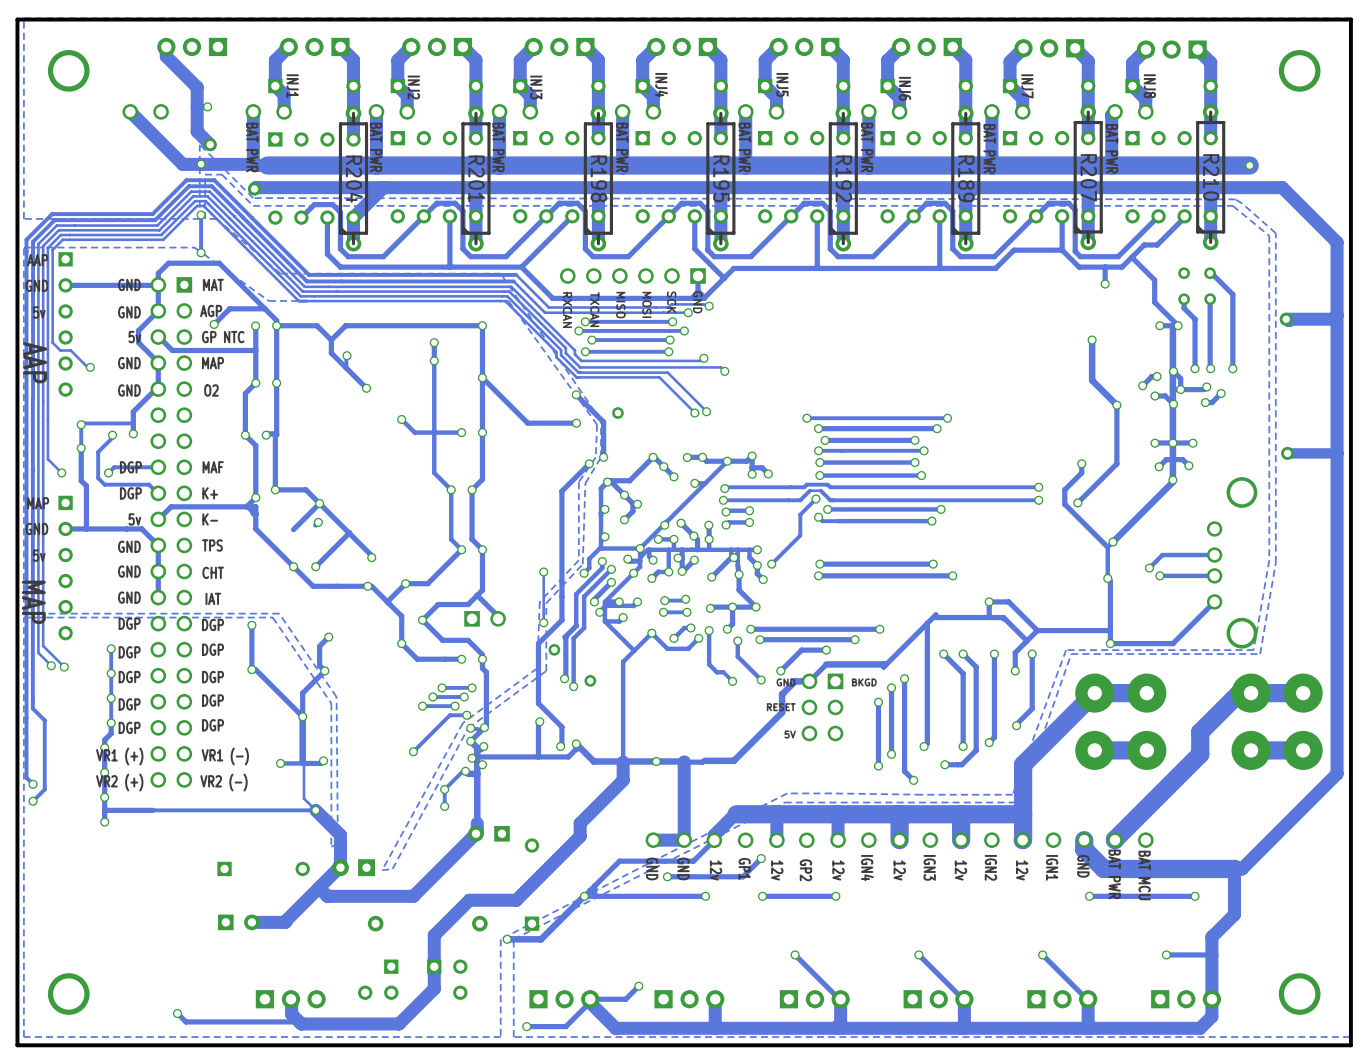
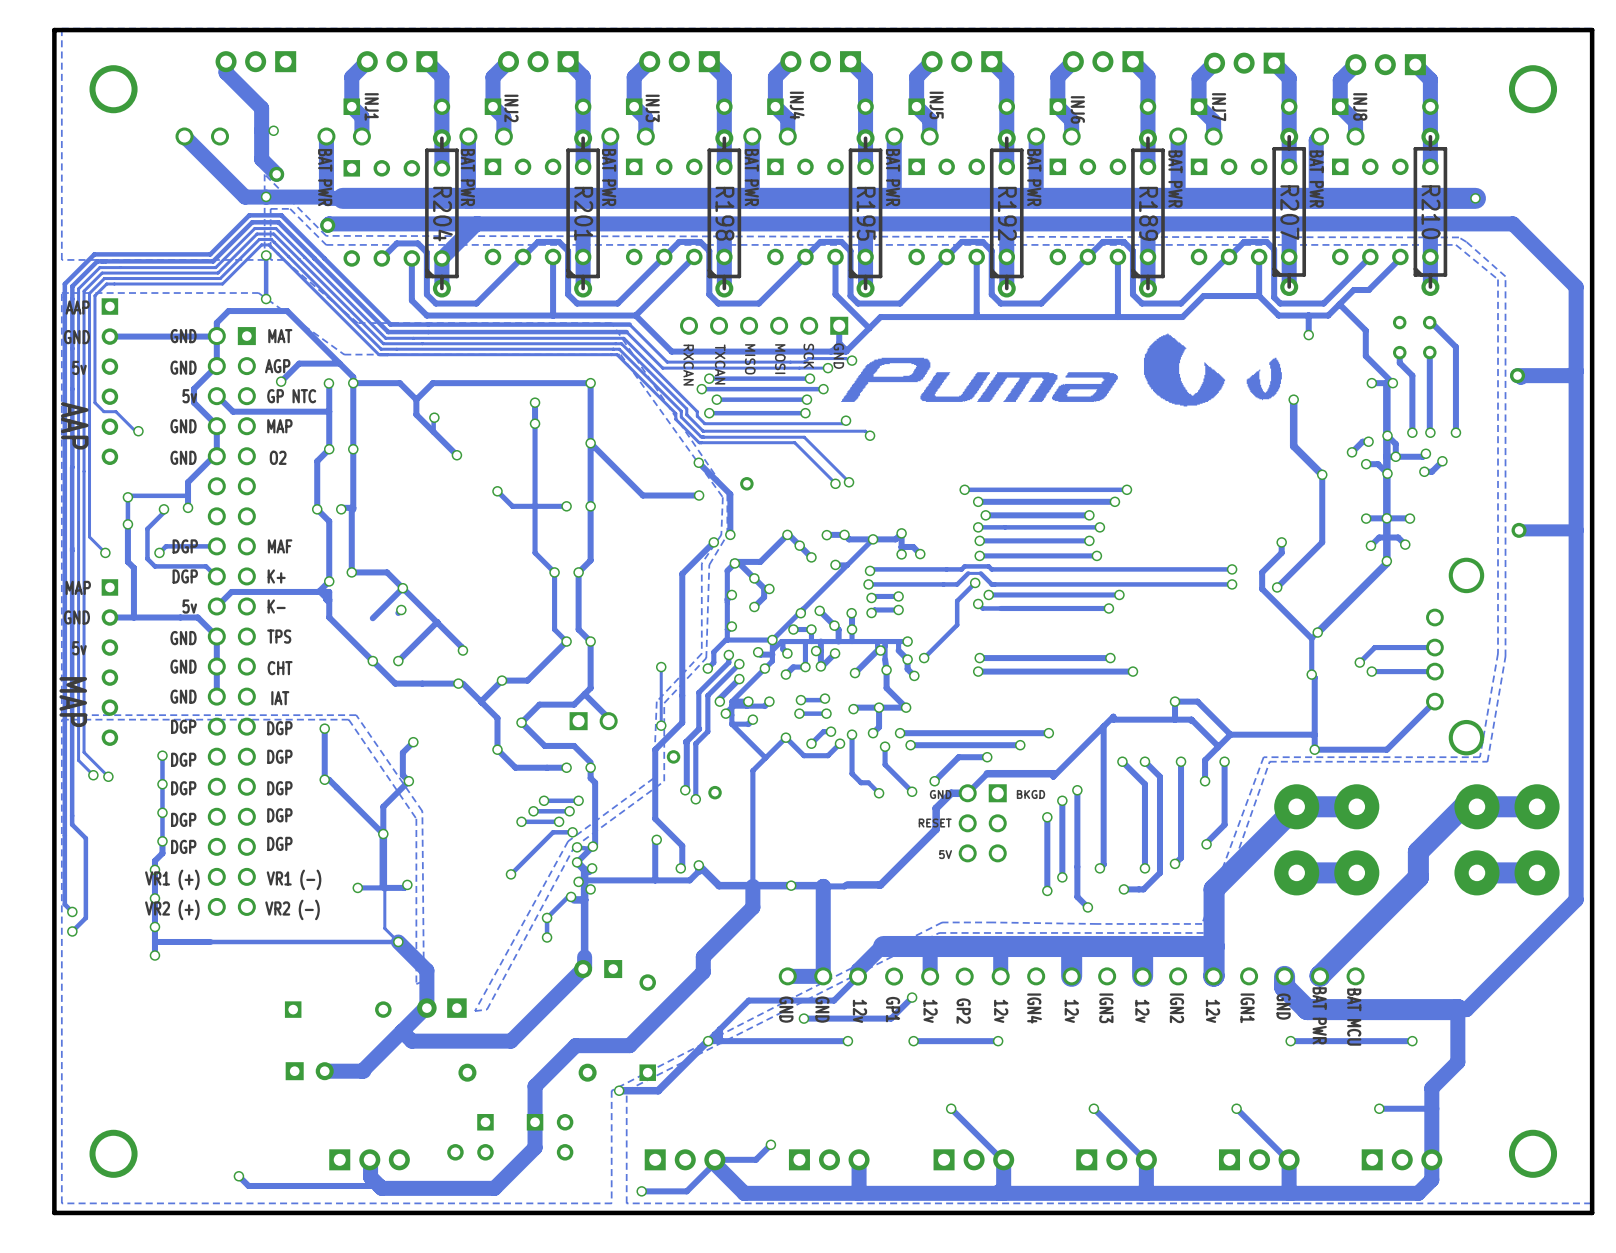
part: none -> (1061, 369)

